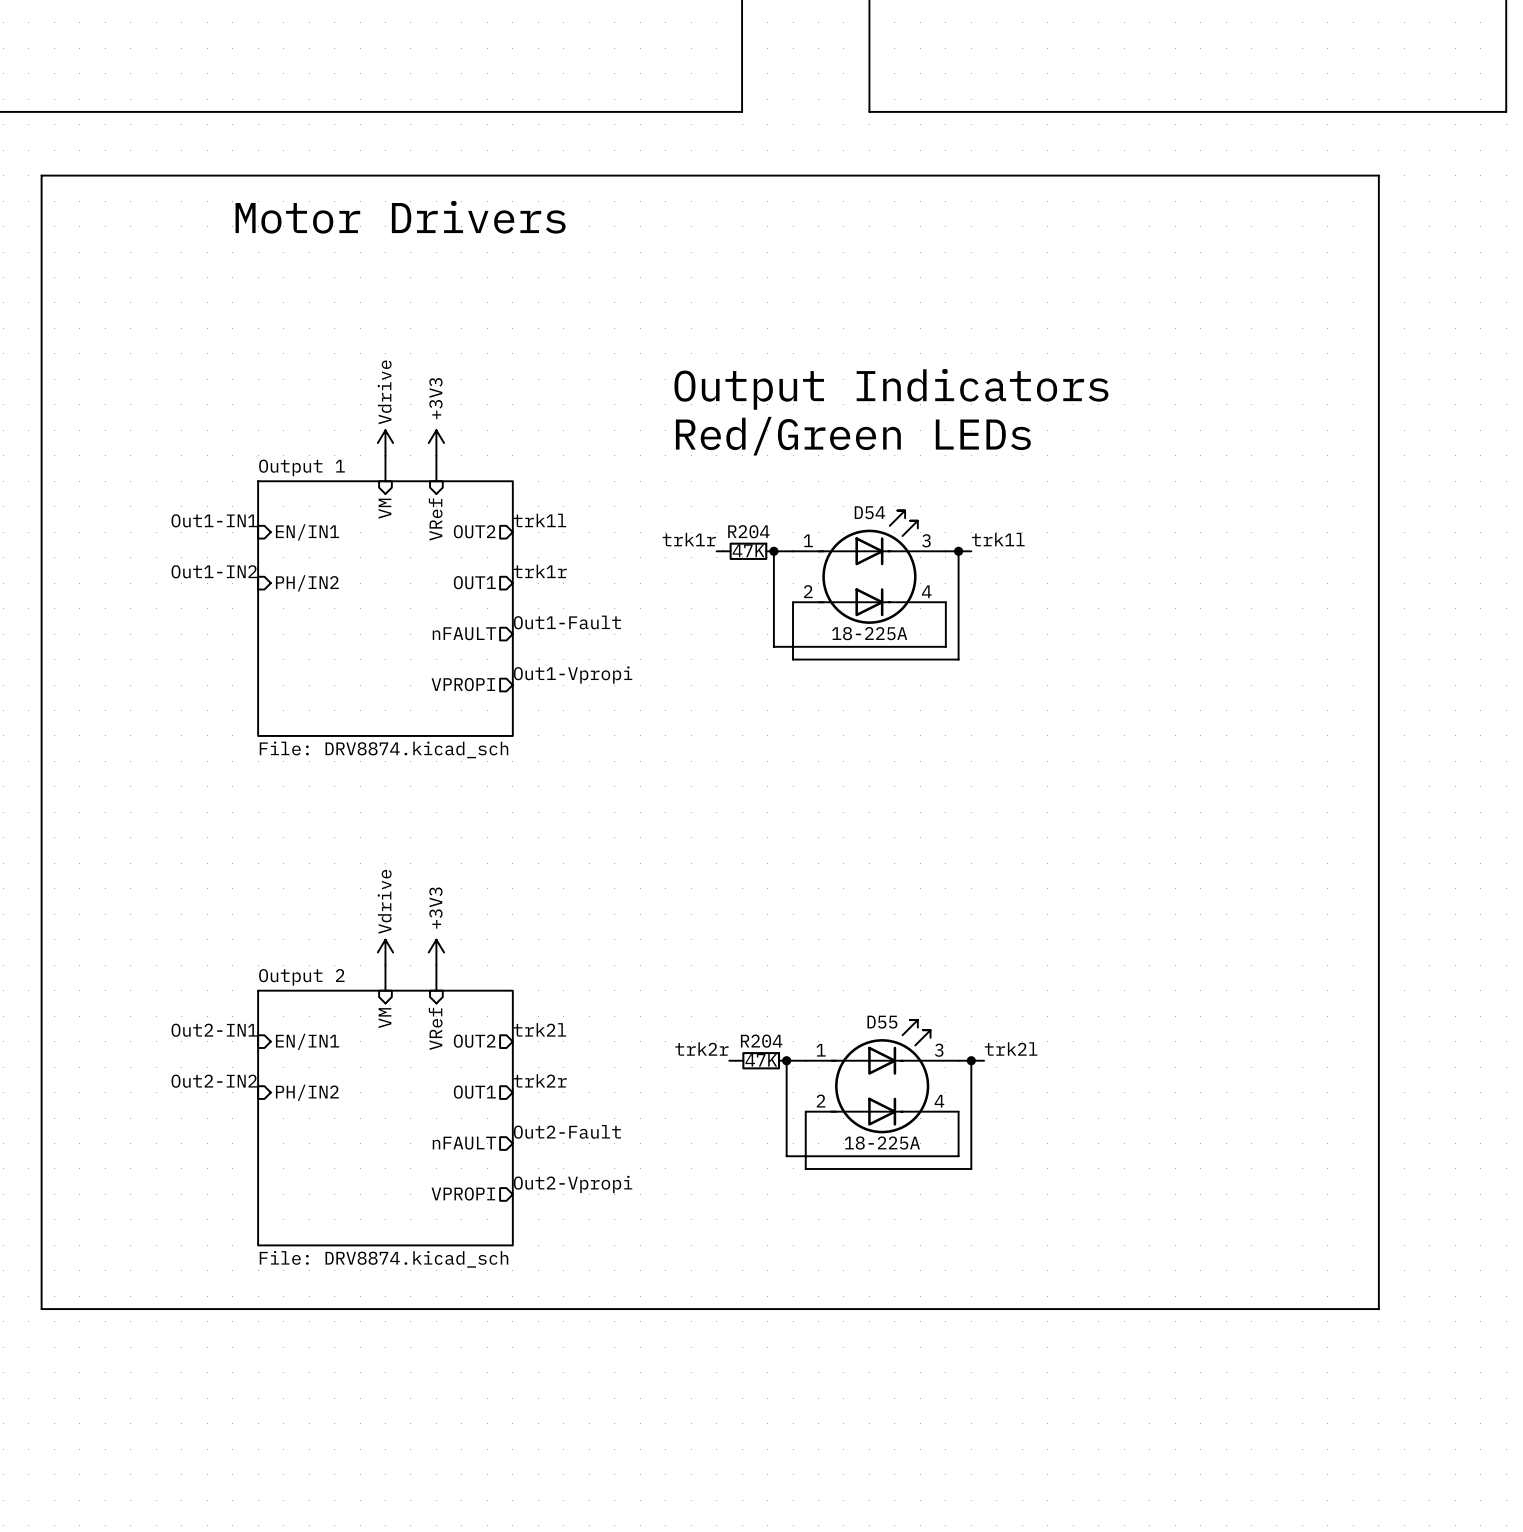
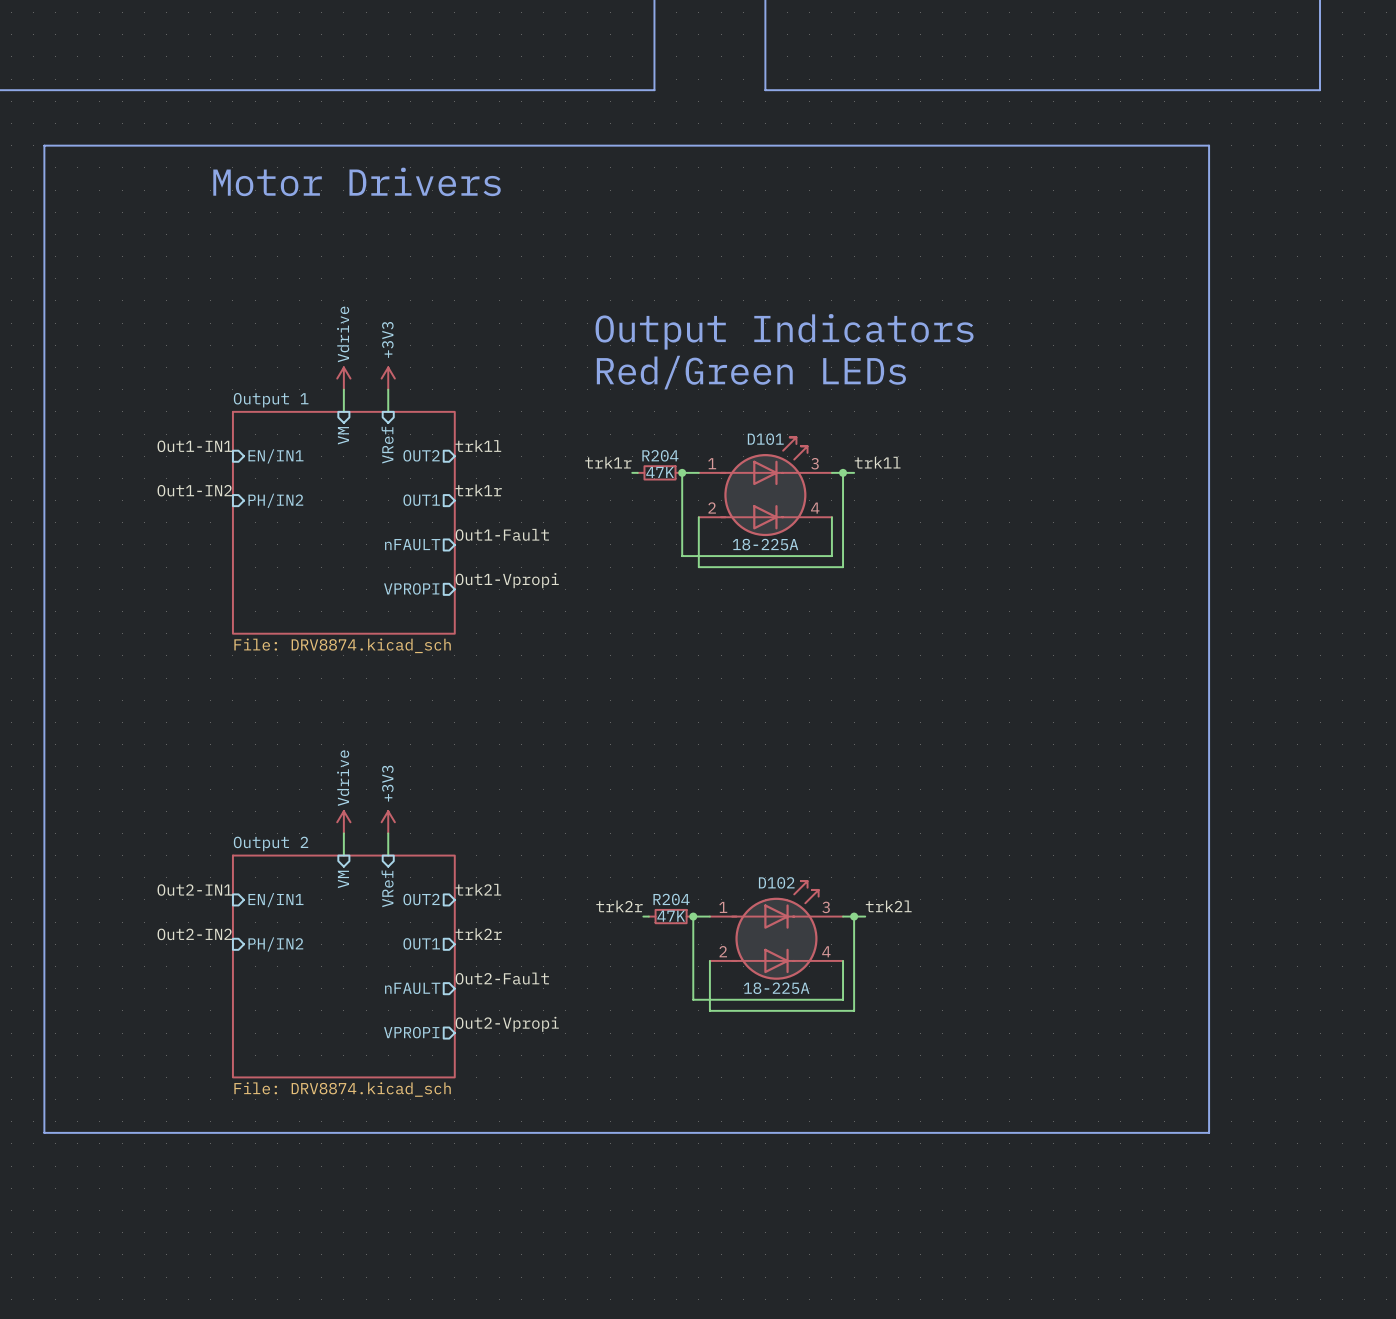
D54 name: D54 (869, 512) -> D101 (765, 439)
D55 name: D55 (882, 1022) -> D102 (776, 882)

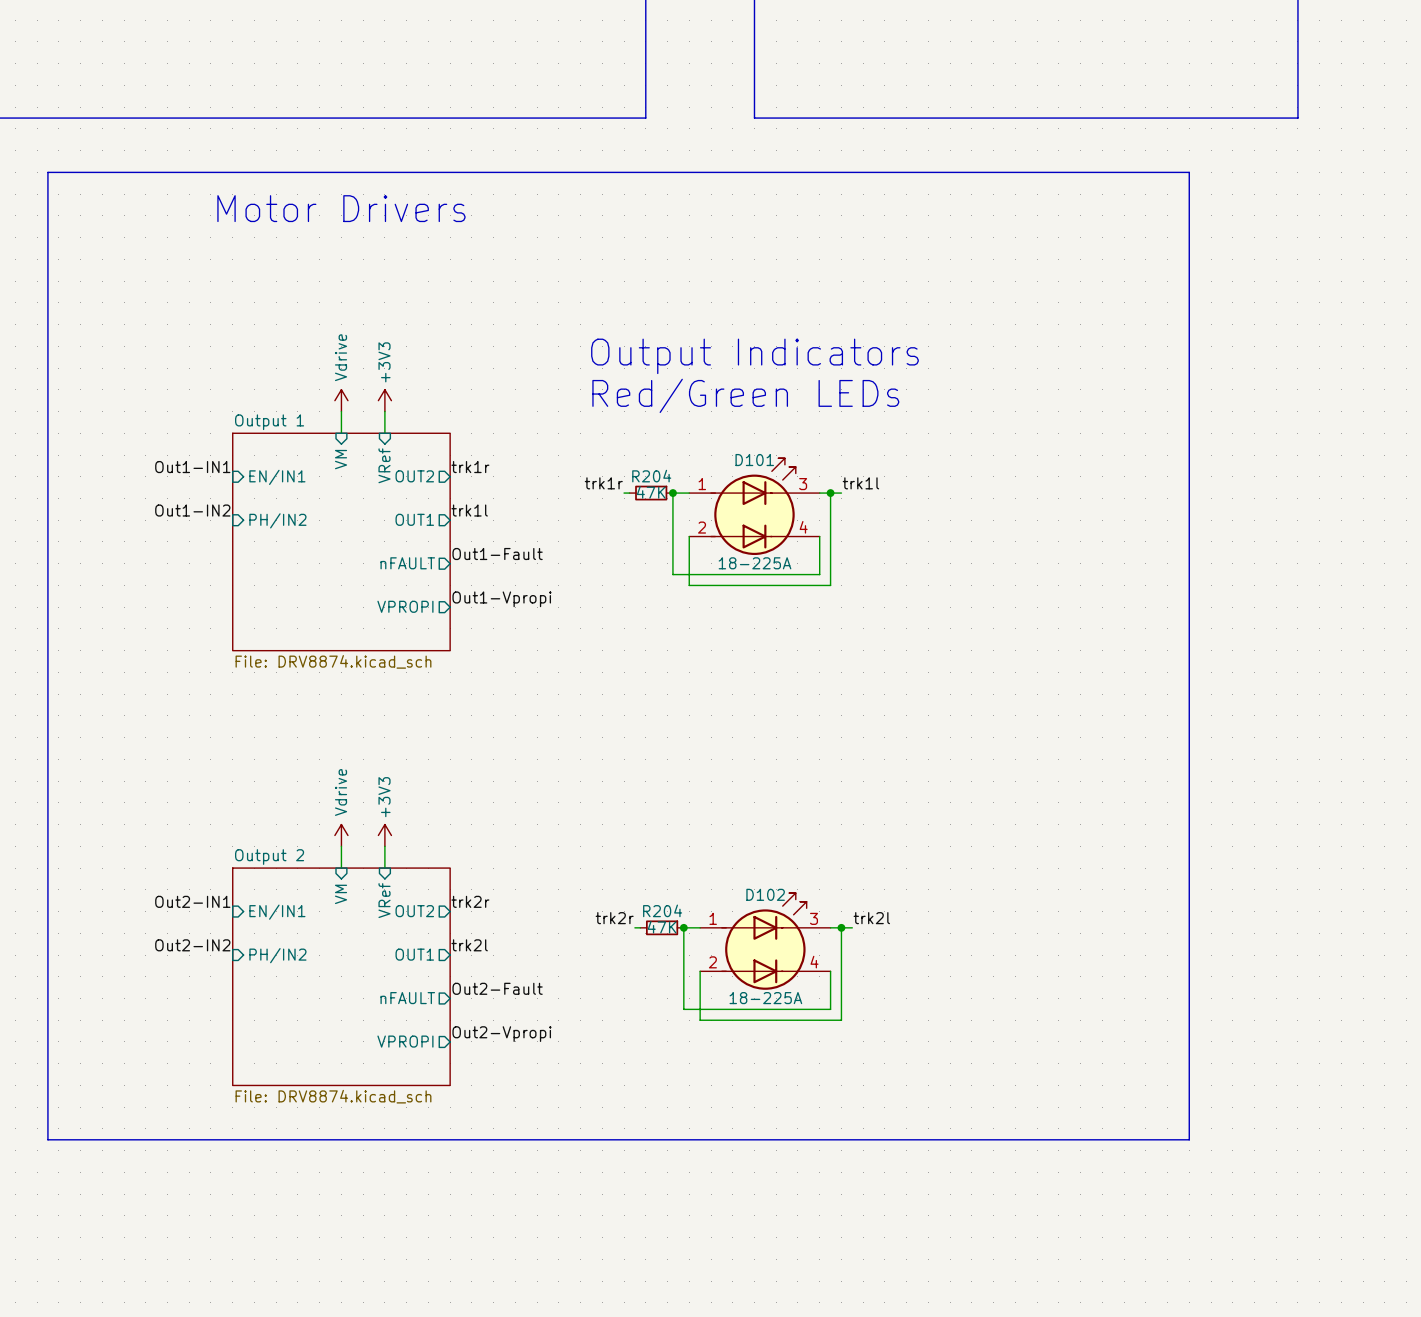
label: trk1l (478, 446) -> trk1r (470, 467)
label: trk1r (478, 490) -> trk1l (469, 510)
label: trk2l (478, 889) -> trk2r (470, 901)
label: trk2r (478, 934) -> trk2l (469, 945)

